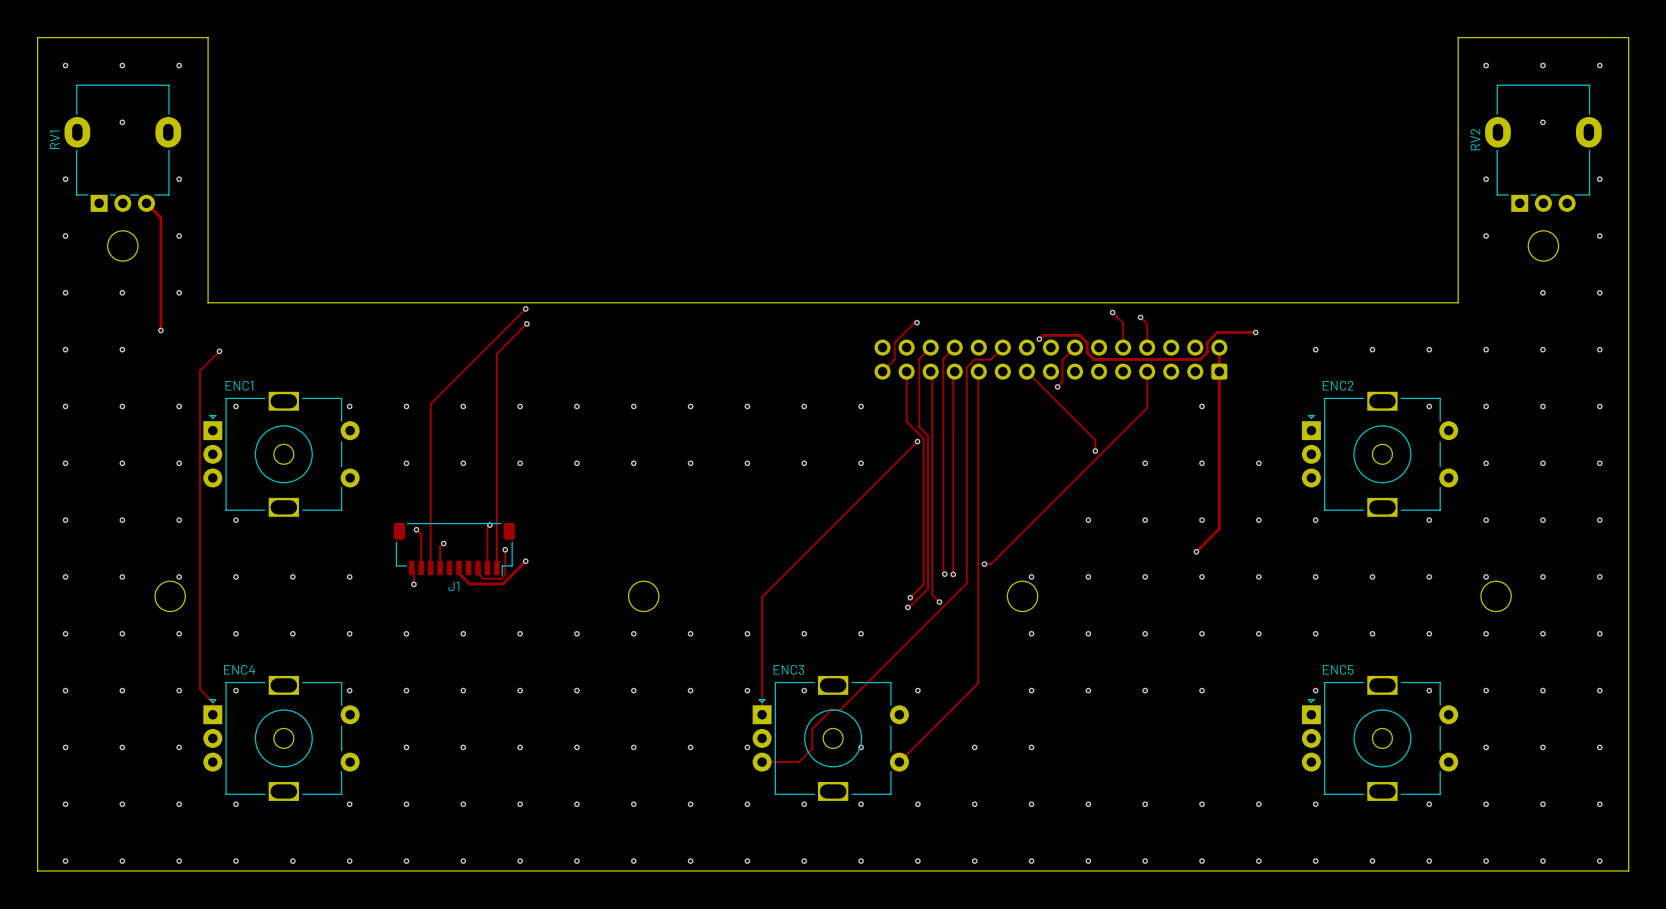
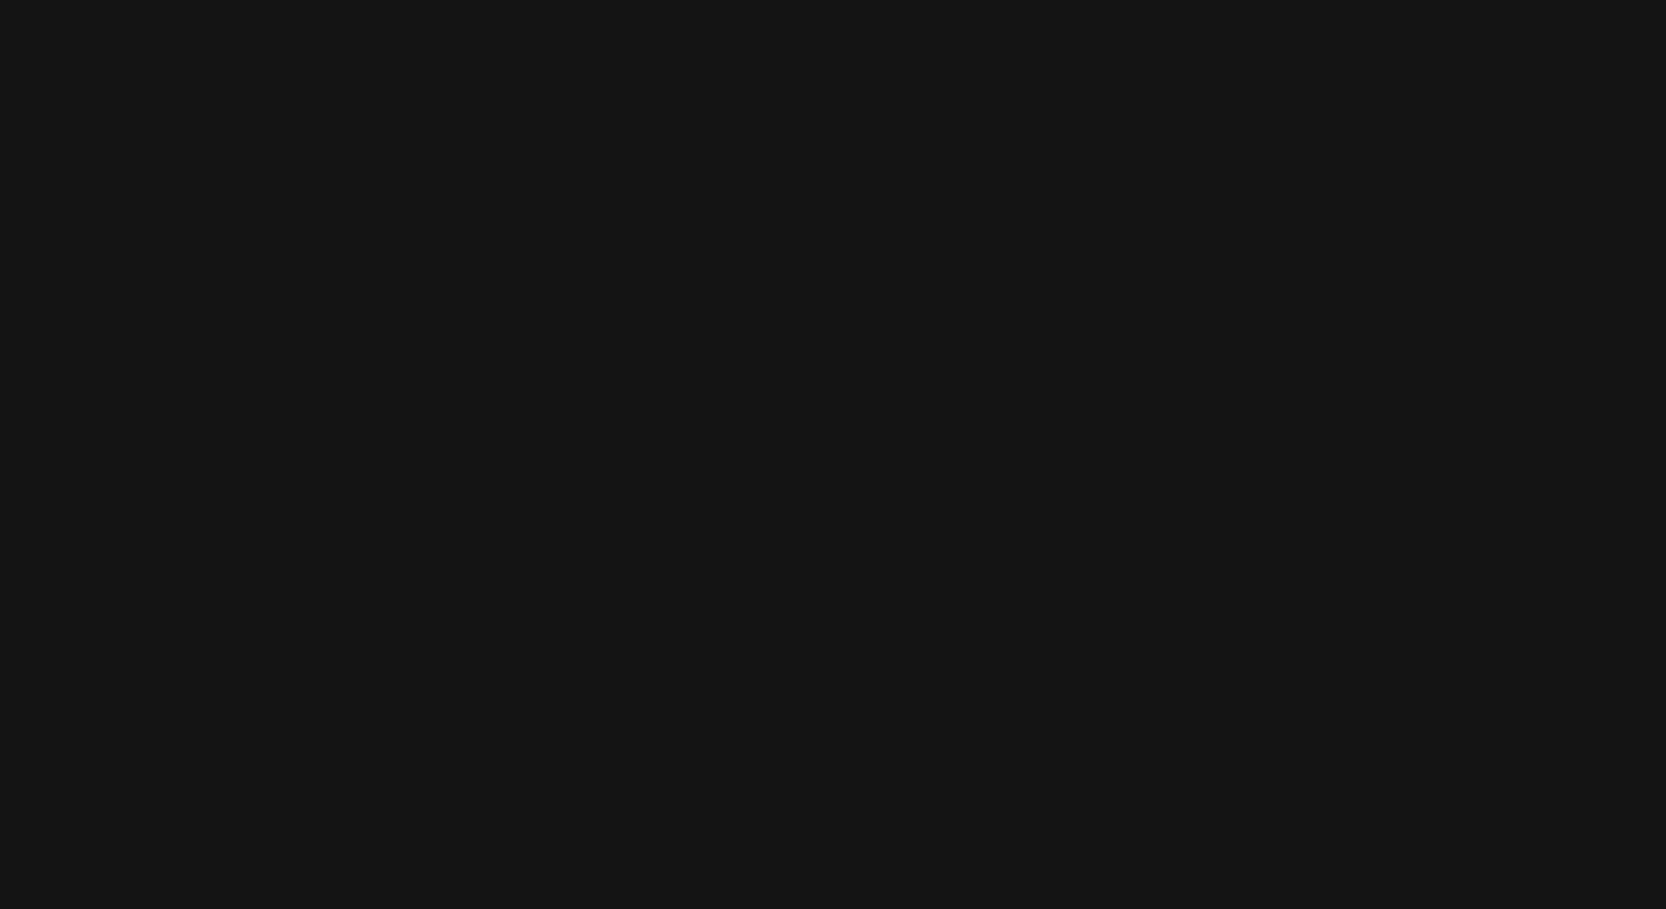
board edge: (37, 37) (208, 37) (208, 302) (1458, 302) (1458, 37) (1628, 37) (1628, 871) (37, 871) (37, 37) -> none
via: (65, 65) -> none
via: (122, 65) -> none
via: (179, 65) -> none
via: (1486, 65) -> none
via: (1542, 65) -> none
via: (1599, 65) -> none
via: (122, 122) -> none
via: (1542, 122) -> none
RV1: (122, 148) -> none
RV2: (1543, 148) -> none
via: (65, 179) -> none
via: (179, 179) -> none
via: (1486, 179) -> none
via: (1599, 179) -> none
track: (146, 203) (160, 217) (160, 330) -> none
round board edge: [107, 230, 139, 262] -> none
round board edge: [1527, 230, 1560, 262] -> none
via: (65, 236) -> none
via: (179, 236) -> none
via: (1486, 236) -> none
via: (1599, 236) -> none
via: (65, 292) -> none
via: (122, 292) -> none
via: (179, 292) -> none
via: (1542, 292) -> none
via: (1599, 292) -> none
track: (525, 308) (430, 404) (430, 567) -> none
via: (525, 308) -> none
track: (1112, 312) (1123, 323) (1123, 347) -> none
via: (1112, 312) -> none
track: (1140, 317) (1147, 323) (1147, 347) -> none
via: (1140, 317) -> none
track: (916, 322) (914, 322) (894, 342) (894, 359) (882, 371) -> none
via: (916, 322) -> none
track: (526, 323) (496, 353) (496, 567) -> none
via: (526, 323) -> none
via: (160, 330) -> none
track: (1255, 332) (1217, 332) (1207, 342) (1207, 352) (1200, 359) (1094, 359) (1087, 352) (1087, 342) (1079, 335) (1043, 335) (1039, 339) -> none
via: (1255, 332) -> none
via: (1039, 339) -> none
track: (930, 347) (919, 358) (919, 427) (927, 435) (927, 588) (907, 607) -> none
track: (954, 347) (943, 358) (944, 574) (942, 574) -> none
track: (1002, 347) (990, 359) (974, 359) (966, 367) (966, 583) (840, 710) (831, 710) (812, 728) (812, 748) (798, 762) (762, 762) -> none
track: (1075, 347) (1062, 360) (1062, 382) (1057, 386) -> none
track: (1219, 347) (1219, 528) (1196, 551) -> none
via: (65, 349) -> none
via: (122, 349) -> none
via: (1315, 349) -> none
via: (1372, 349) -> none
via: (1429, 349) -> none
via: (1486, 349) -> none
via: (1542, 349) -> none
via: (1599, 349) -> none
track: (219, 351) (200, 370) (200, 689) (212, 701) (212, 714) -> none
via: (219, 351) -> none
part: (1050, 359) -> none
track: (906, 371) (906, 421) (923, 438) (923, 584) (910, 597) -> none
track: (930, 371) (932, 373) (932, 594) (939, 602) -> none
track: (954, 371) (953, 574) -> none
track: (978, 371) (978, 683) (899, 762) -> none
track: (1026, 371) (1095, 440) (1095, 451) -> none
track: (1147, 371) (1147, 408) (991, 564) (984, 564) -> none
via: (1057, 386) -> none
via: (65, 406) -> none
via: (122, 406) -> none
via: (179, 406) -> none
via: (236, 406) -> none
via: (349, 406) -> none
via: (406, 406) -> none
via: (463, 406) -> none
via: (520, 406) -> none
via: (576, 406) -> none
via: (633, 406) -> none
via: (690, 406) -> none
via: (747, 406) -> none
via: (804, 406) -> none
via: (861, 406) -> none
via: (1202, 406) -> none
via: (1429, 406) -> none
via: (1486, 406) -> none
via: (1542, 406) -> none
via: (1599, 406) -> none
track: (917, 441) (762, 597) (762, 714) -> none
via: (917, 441) -> none
via: (1095, 451) -> none
ENC1: (281, 454) -> none
ENC2: (1380, 454) -> none
via: (65, 463) -> none
via: (122, 463) -> none
via: (179, 463) -> none
via: (406, 463) -> none
via: (463, 463) -> none
via: (520, 463) -> none
via: (576, 463) -> none
via: (633, 463) -> none
via: (690, 463) -> none
via: (747, 463) -> none
via: (804, 463) -> none
via: (861, 463) -> none
via: (1145, 463) -> none
via: (1202, 463) -> none
via: (1258, 463) -> none
via: (1486, 463) -> none
via: (1542, 463) -> none
via: (1599, 463) -> none
via: (65, 520) -> none
via: (122, 520) -> none
via: (179, 520) -> none
via: (236, 520) -> none
via: (1088, 520) -> none
via: (1145, 520) -> none
via: (1202, 520) -> none
via: (1258, 520) -> none
via: (1315, 520) -> none
via: (1429, 520) -> none
via: (1486, 520) -> none
via: (1542, 520) -> none
via: (1599, 520) -> none
track: (489, 525) (487, 527) (487, 567) -> none
via: (489, 525) -> none
track: (416, 529) (421, 534) (421, 567) -> none
via: (416, 529) -> none
track: (443, 543) (440, 547) (440, 567) -> none
via: (443, 543) -> none
J1: (454, 549) -> none
track: (505, 549) (505, 574) (501, 578) (483, 578) (477, 573) (477, 567) -> none
via: (505, 549) -> none
via: (1196, 551) -> none
track: (525, 561) (503, 583) (469, 583) (459, 573) (459, 567) -> none
via: (525, 561) -> none
via: (984, 564) -> none
track: (411, 567) (413, 570) (413, 584) -> none
via: (944, 574) -> none
via: (953, 574) -> none
via: (65, 576) -> none
via: (122, 576) -> none
via: (179, 576) -> none
via: (236, 576) -> none
via: (292, 576) -> none
via: (349, 576) -> none
via: (1031, 576) -> none
via: (1088, 576) -> none
via: (1145, 576) -> none
via: (1202, 576) -> none
via: (1258, 576) -> none
via: (1315, 576) -> none
via: (1372, 576) -> none
via: (1429, 576) -> none
via: (1486, 576) -> none
via: (1542, 576) -> none
via: (1599, 576) -> none
round board edge: [154, 580, 186, 612] -> none
round board edge: [628, 580, 660, 612] -> none
round board edge: [1006, 580, 1039, 612] -> none
round board edge: [1480, 580, 1512, 612] -> none
via: (413, 584) -> none
via: (910, 597) -> none
via: (939, 602) -> none
via: (907, 607) -> none
via: (65, 633) -> none
via: (122, 633) -> none
via: (179, 633) -> none
via: (236, 633) -> none
via: (292, 633) -> none
via: (349, 633) -> none
via: (406, 633) -> none
via: (463, 633) -> none
via: (520, 633) -> none
via: (576, 633) -> none
via: (633, 633) -> none
via: (690, 633) -> none
via: (747, 633) -> none
via: (804, 633) -> none
via: (861, 633) -> none
via: (1031, 633) -> none
via: (1088, 633) -> none
via: (1145, 633) -> none
via: (1202, 633) -> none
via: (1258, 633) -> none
via: (1315, 633) -> none
via: (1372, 633) -> none
via: (1429, 633) -> none
via: (1486, 633) -> none
via: (1542, 633) -> none
via: (1599, 633) -> none
via: (65, 690) -> none
via: (122, 690) -> none
via: (179, 690) -> none
via: (236, 690) -> none
via: (349, 690) -> none
via: (406, 690) -> none
via: (463, 690) -> none
via: (520, 690) -> none
via: (576, 690) -> none
via: (633, 690) -> none
via: (690, 690) -> none
via: (747, 690) -> none
via: (804, 690) -> none
via: (917, 690) -> none
via: (1031, 690) -> none
via: (1088, 690) -> none
via: (1145, 690) -> none
via: (1202, 690) -> none
via: (1315, 690) -> none
via: (1429, 690) -> none
via: (1486, 690) -> none
via: (1542, 690) -> none
via: (1599, 690) -> none
ENC4: (281, 738) -> none
ENC3: (830, 738) -> none
ENC5: (1380, 738) -> none
via: (65, 747) -> none
via: (122, 747) -> none
via: (179, 747) -> none
via: (406, 747) -> none
via: (463, 747) -> none
via: (520, 747) -> none
via: (576, 747) -> none
via: (633, 747) -> none
via: (690, 747) -> none
via: (747, 747) -> none
via: (861, 747) -> none
via: (974, 747) -> none
via: (1031, 747) -> none
via: (1486, 747) -> none
via: (1542, 747) -> none
via: (1599, 747) -> none
via: (65, 804) -> none
via: (122, 804) -> none
via: (179, 804) -> none
via: (236, 804) -> none
via: (349, 804) -> none
via: (406, 804) -> none
via: (463, 804) -> none
via: (520, 804) -> none
via: (576, 804) -> none
via: (633, 804) -> none
via: (690, 804) -> none
via: (747, 804) -> none
via: (804, 804) -> none
via: (861, 804) -> none
via: (917, 804) -> none
via: (974, 804) -> none
via: (1031, 804) -> none
via: (1088, 804) -> none
via: (1145, 804) -> none
via: (1202, 804) -> none
via: (1258, 804) -> none
via: (1315, 804) -> none
via: (1429, 804) -> none
via: (1486, 804) -> none
via: (1542, 804) -> none
via: (1599, 804) -> none
via: (65, 861) -> none
via: (122, 861) -> none
via: (179, 861) -> none
via: (236, 861) -> none
via: (292, 861) -> none
via: (349, 861) -> none
via: (406, 861) -> none
via: (463, 861) -> none
via: (520, 861) -> none
via: (576, 861) -> none
via: (633, 861) -> none
via: (690, 861) -> none
via: (747, 861) -> none
via: (804, 861) -> none
via: (861, 861) -> none
via: (917, 861) -> none
via: (974, 861) -> none
via: (1031, 861) -> none
via: (1088, 861) -> none
via: (1145, 861) -> none
via: (1202, 861) -> none
via: (1258, 861) -> none
via: (1315, 861) -> none
via: (1372, 861) -> none
via: (1429, 861) -> none
via: (1486, 861) -> none
via: (1542, 861) -> none
via: (1599, 861) -> none

